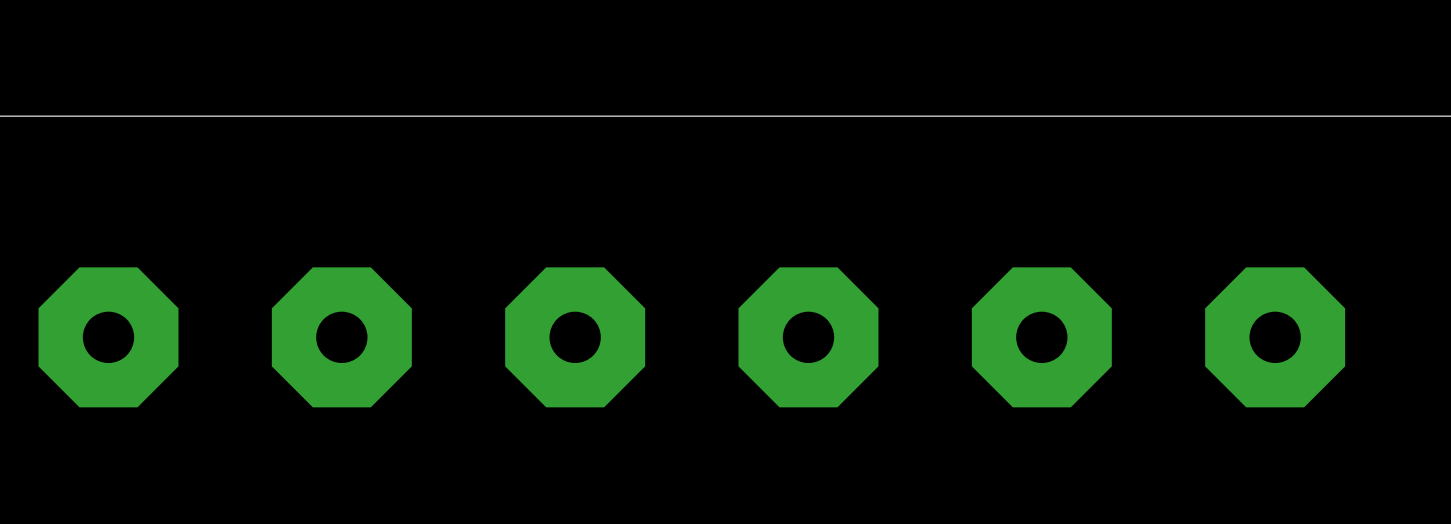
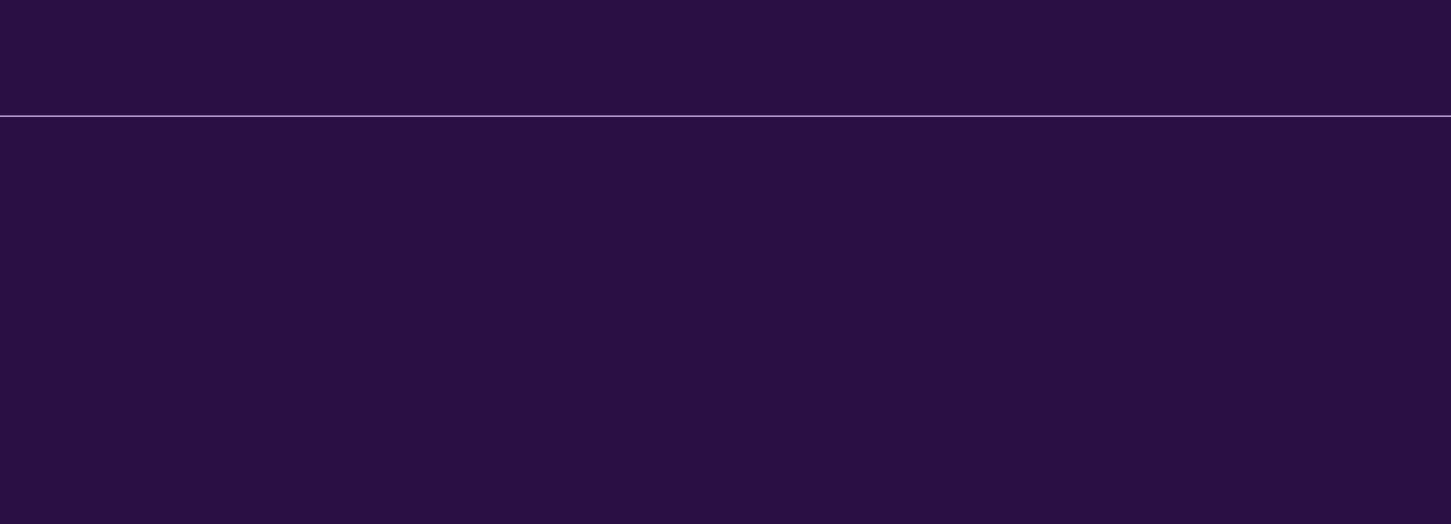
part: (108, 337) -> none
part: (341, 337) -> none
part: (575, 337) -> none
part: (808, 337) -> none
part: (1041, 337) -> none
part: (1275, 337) -> none

